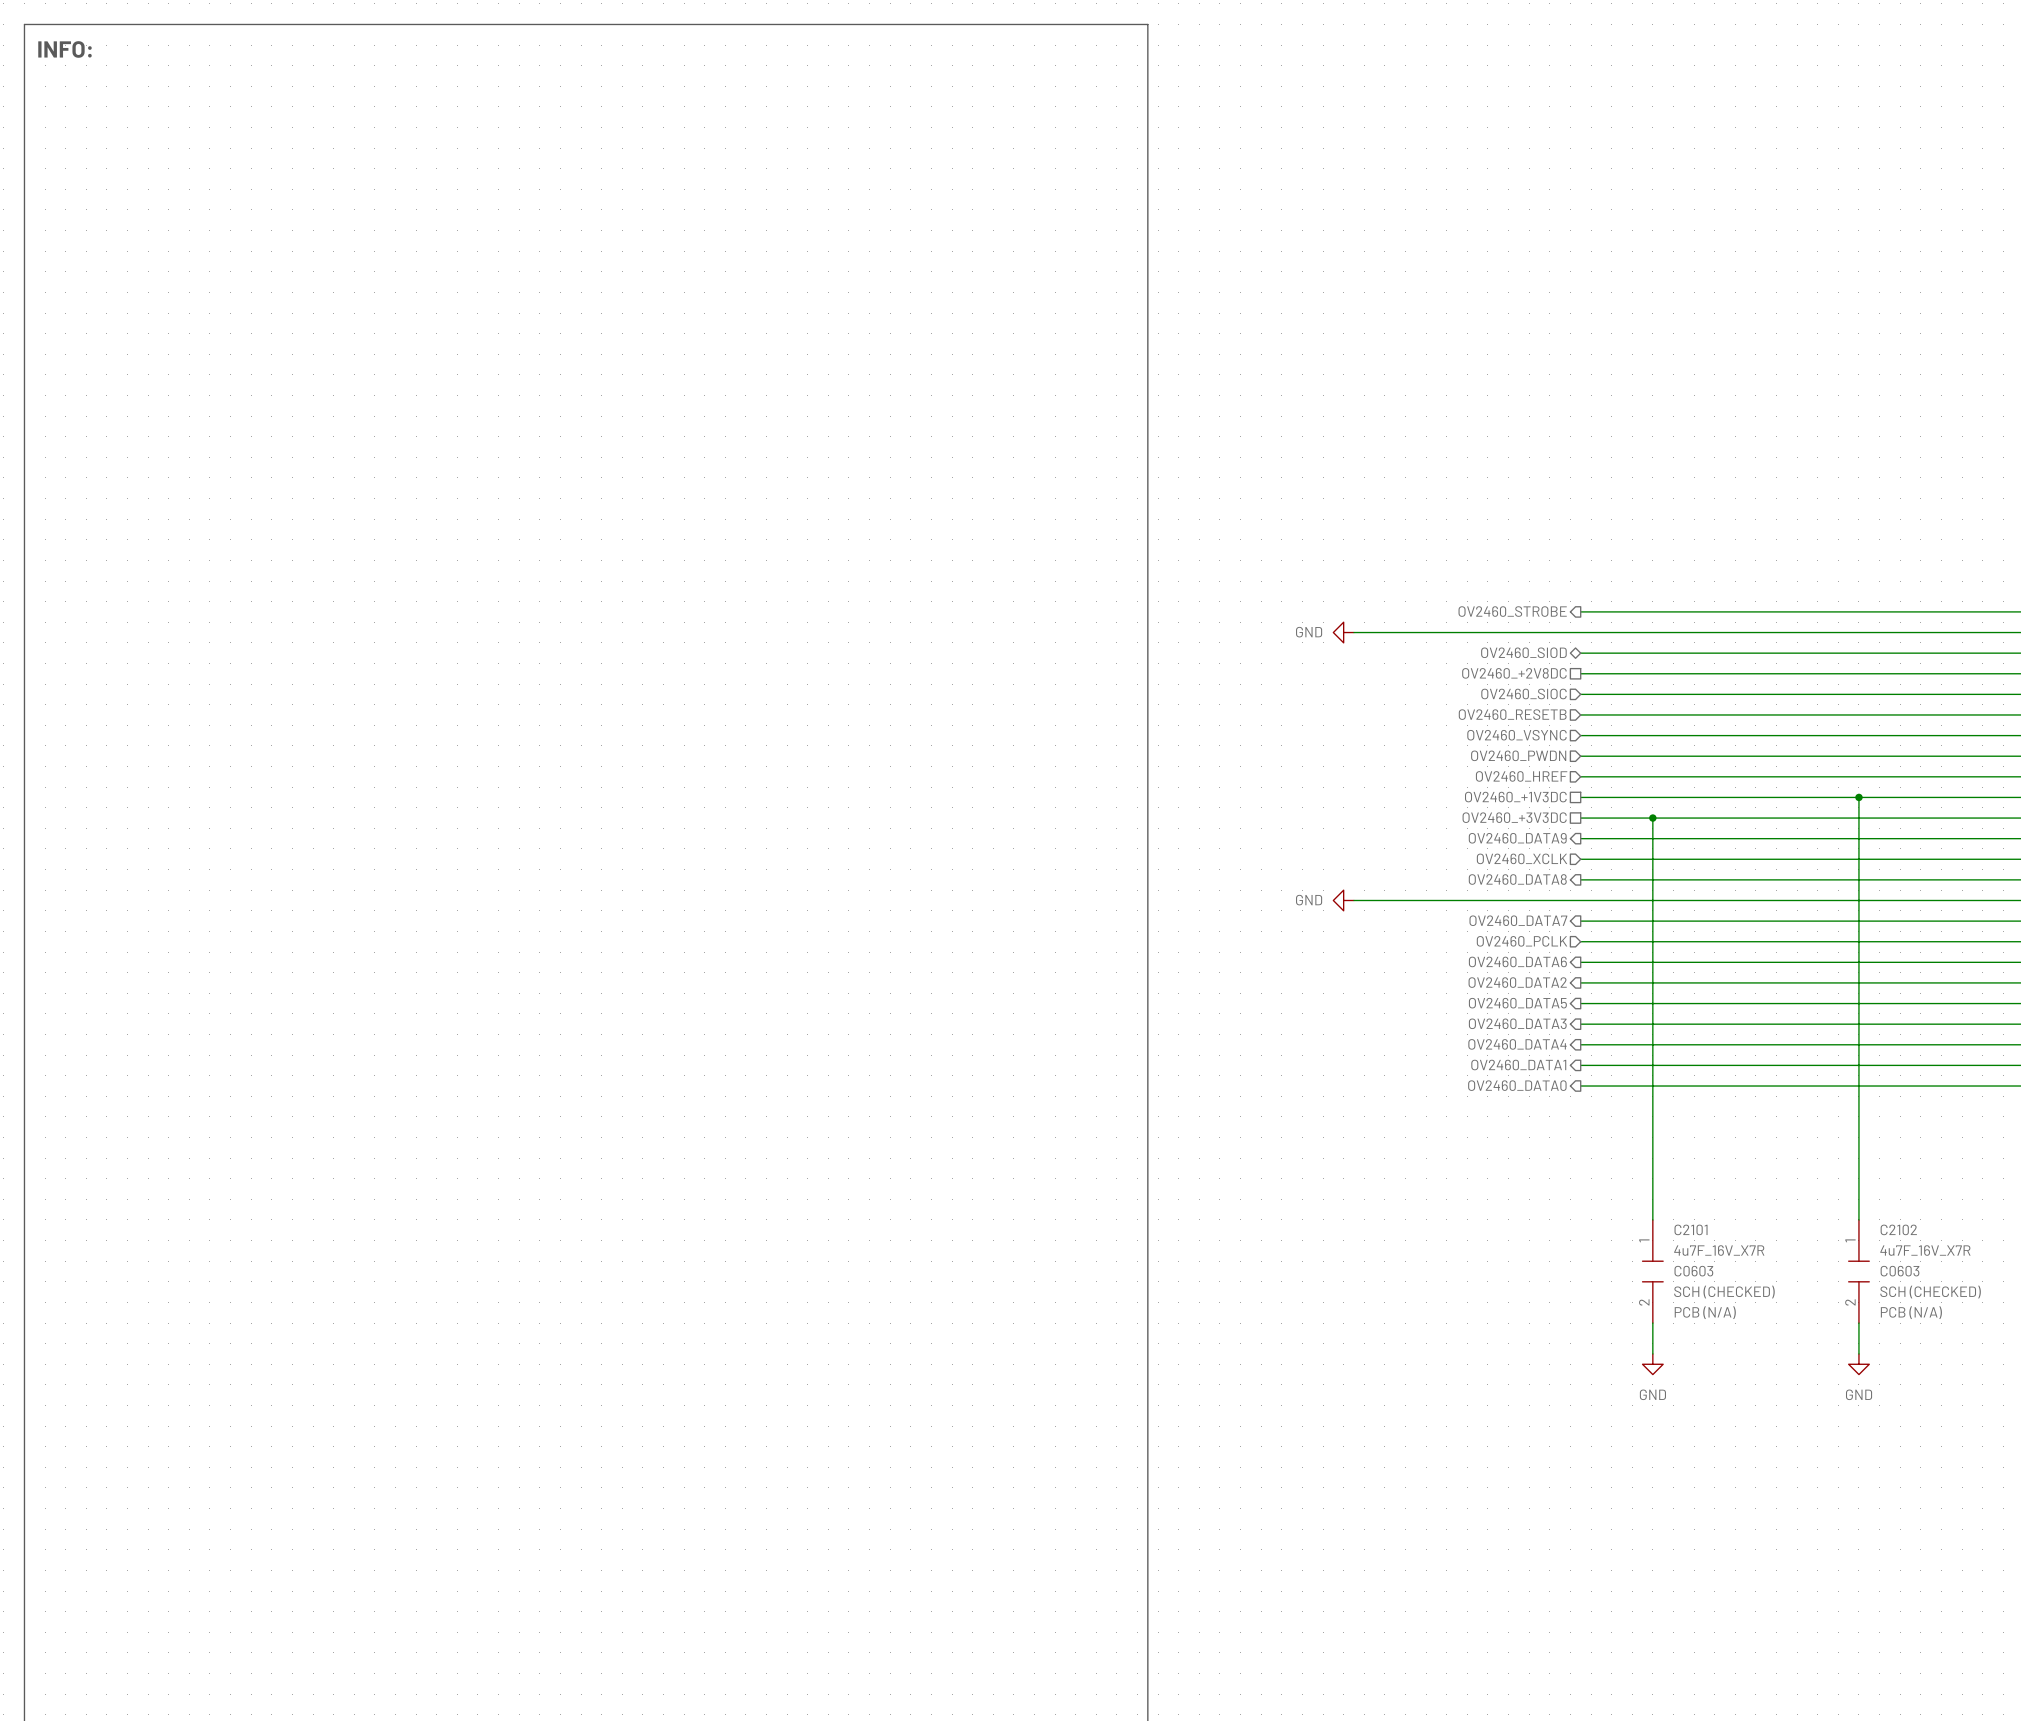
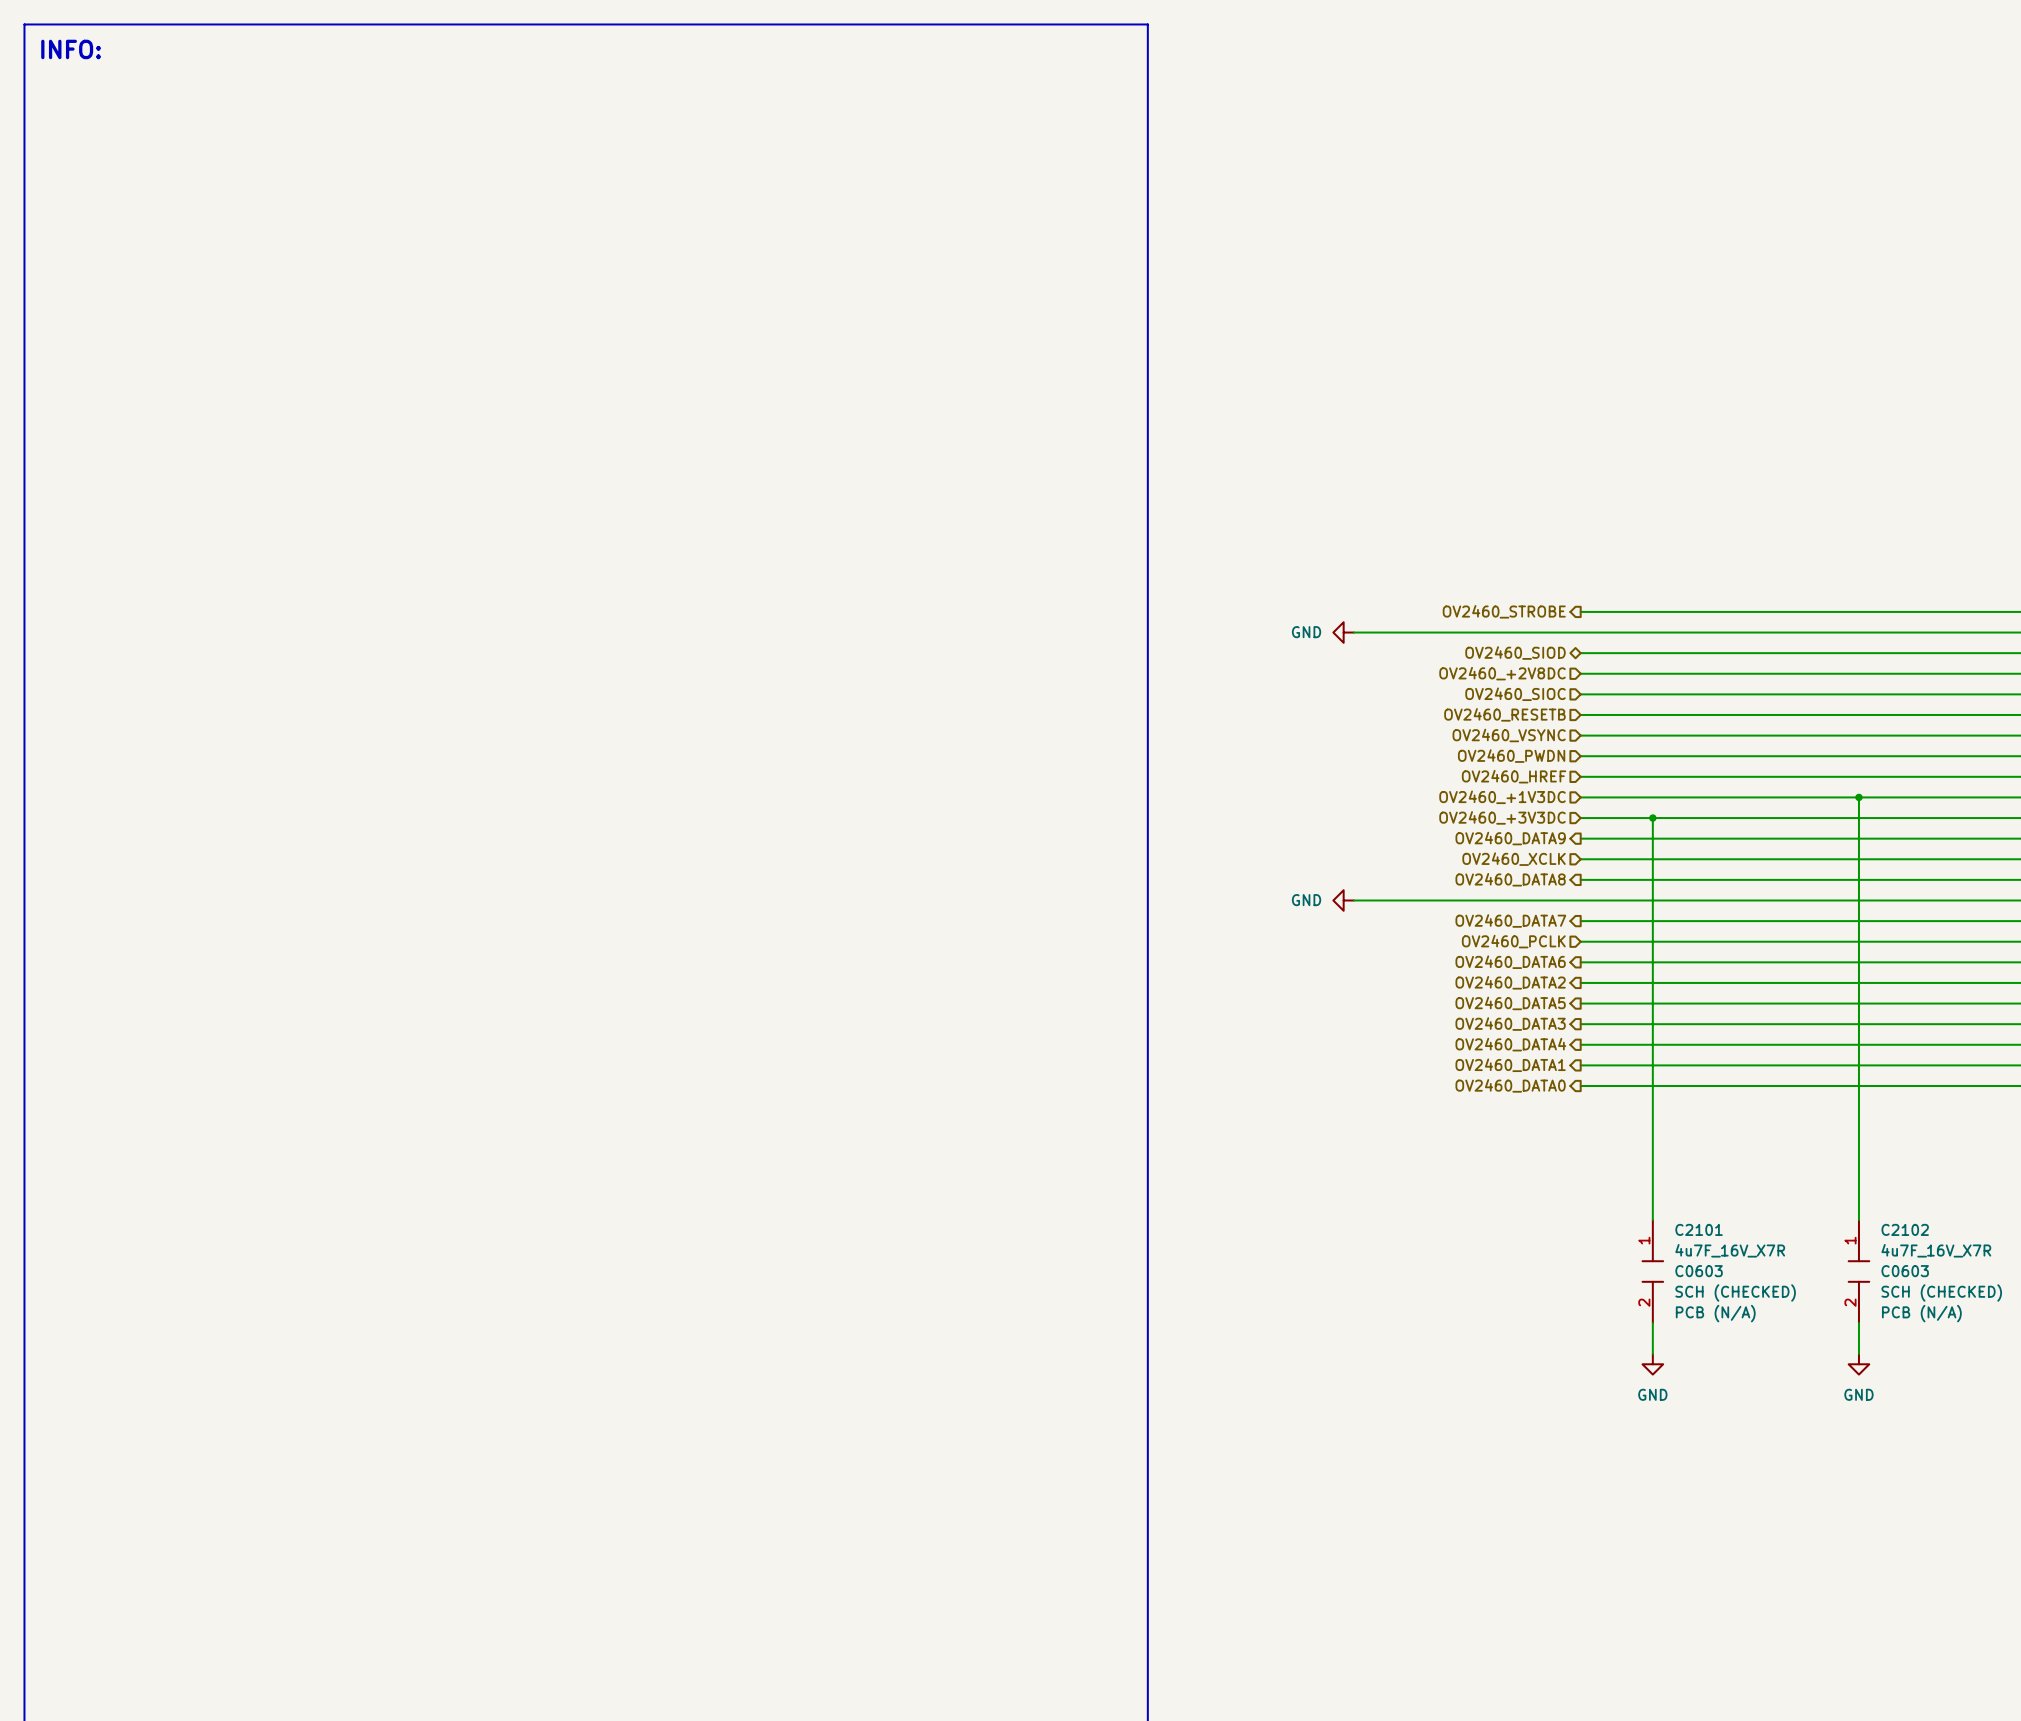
hierarchical label shape: passive (1514, 673) -> input (1502, 673)
hierarchical label shape: passive (1515, 797) -> input (1502, 797)
hierarchical label shape: passive (1514, 817) -> input (1502, 817)

